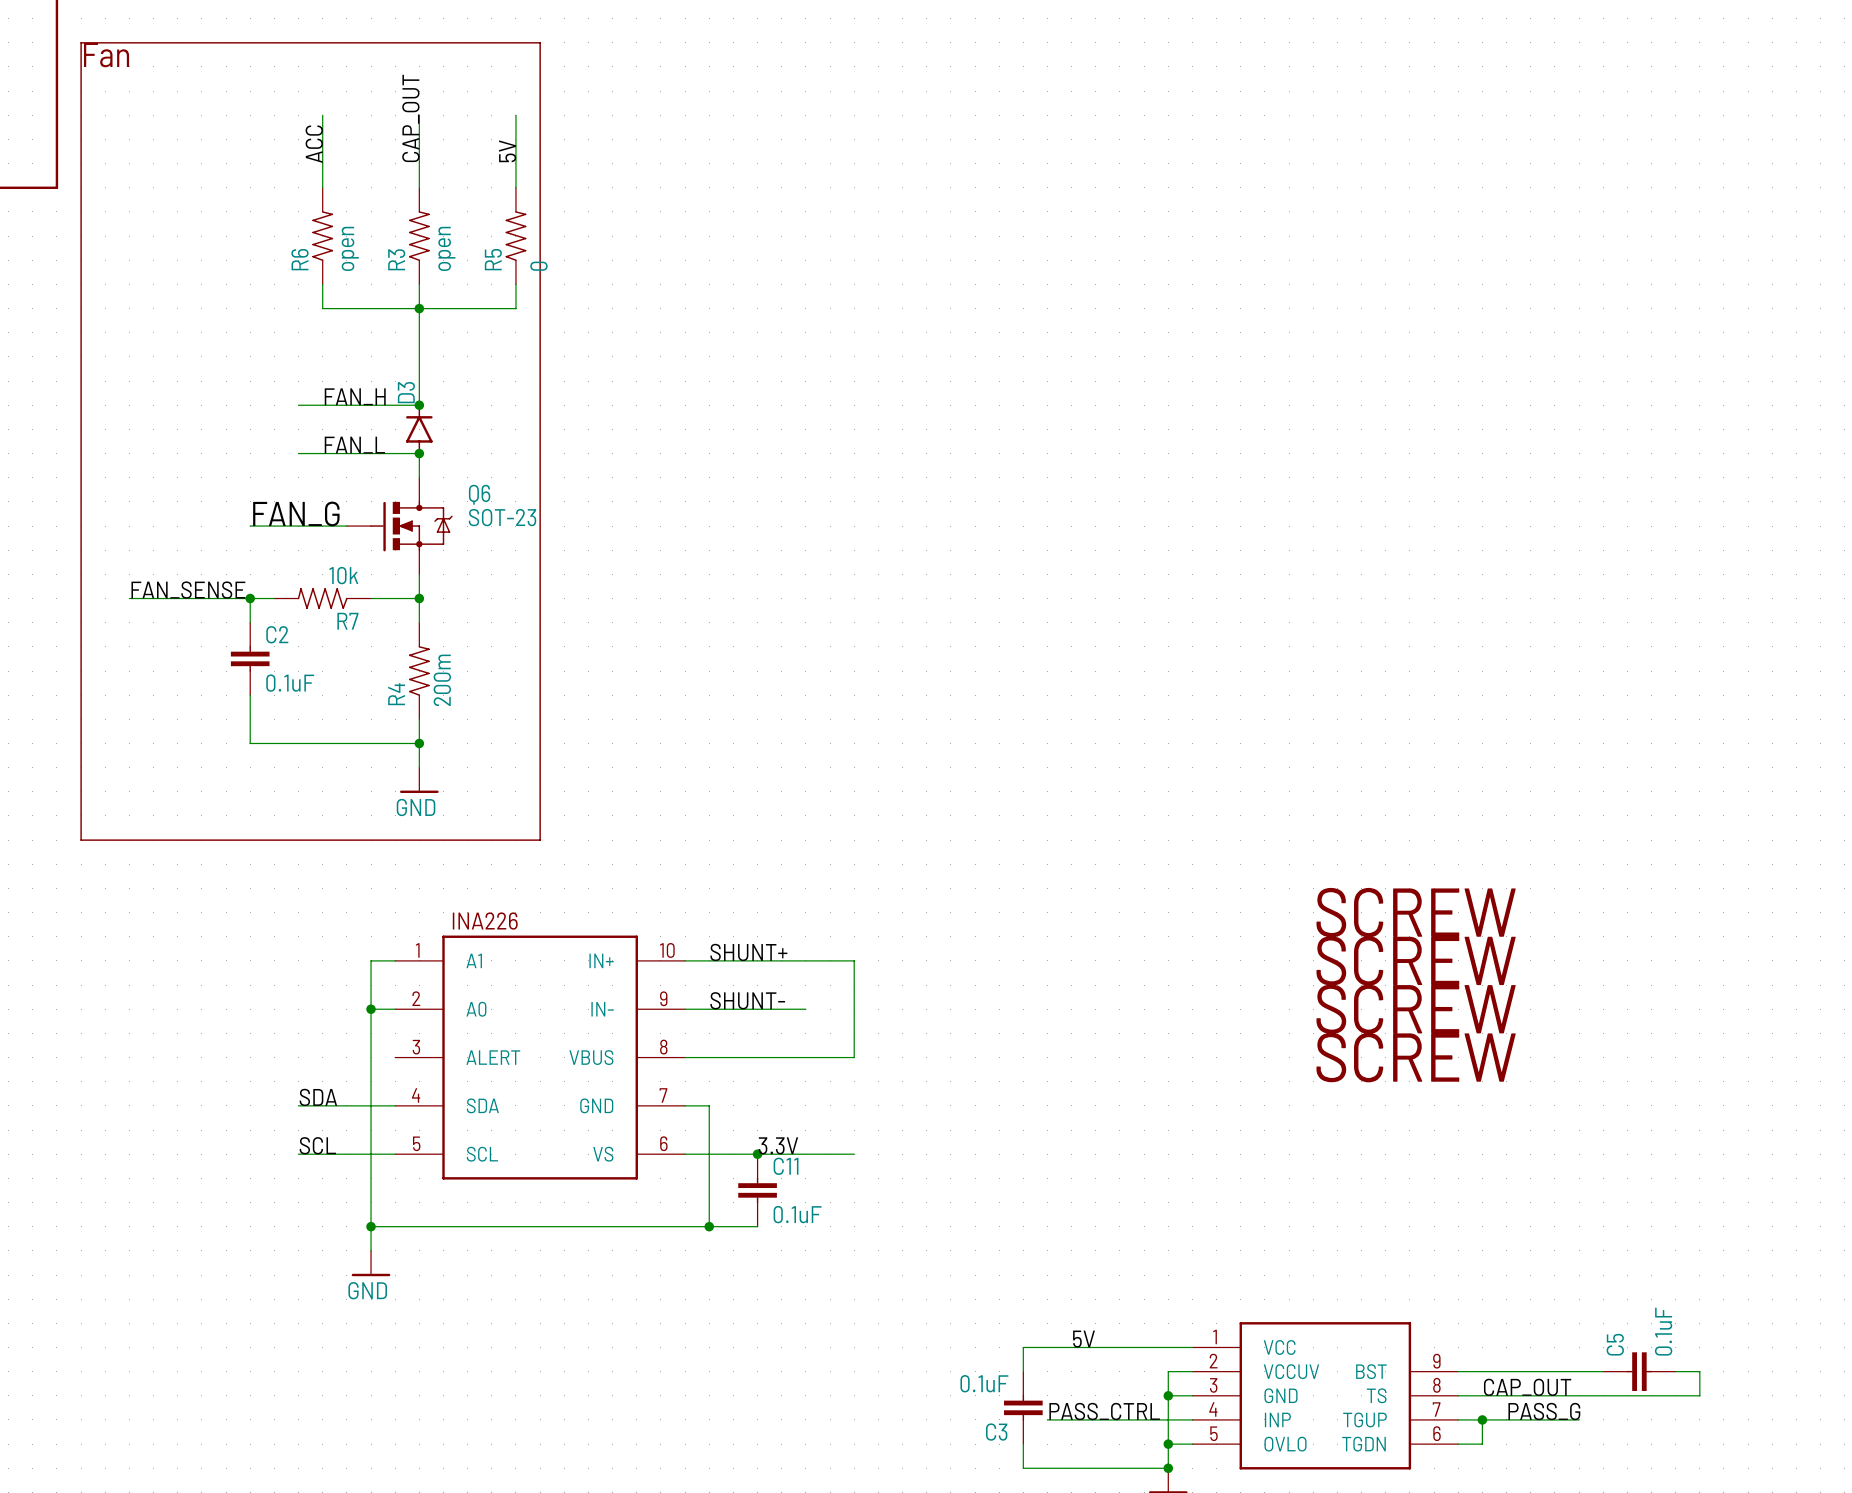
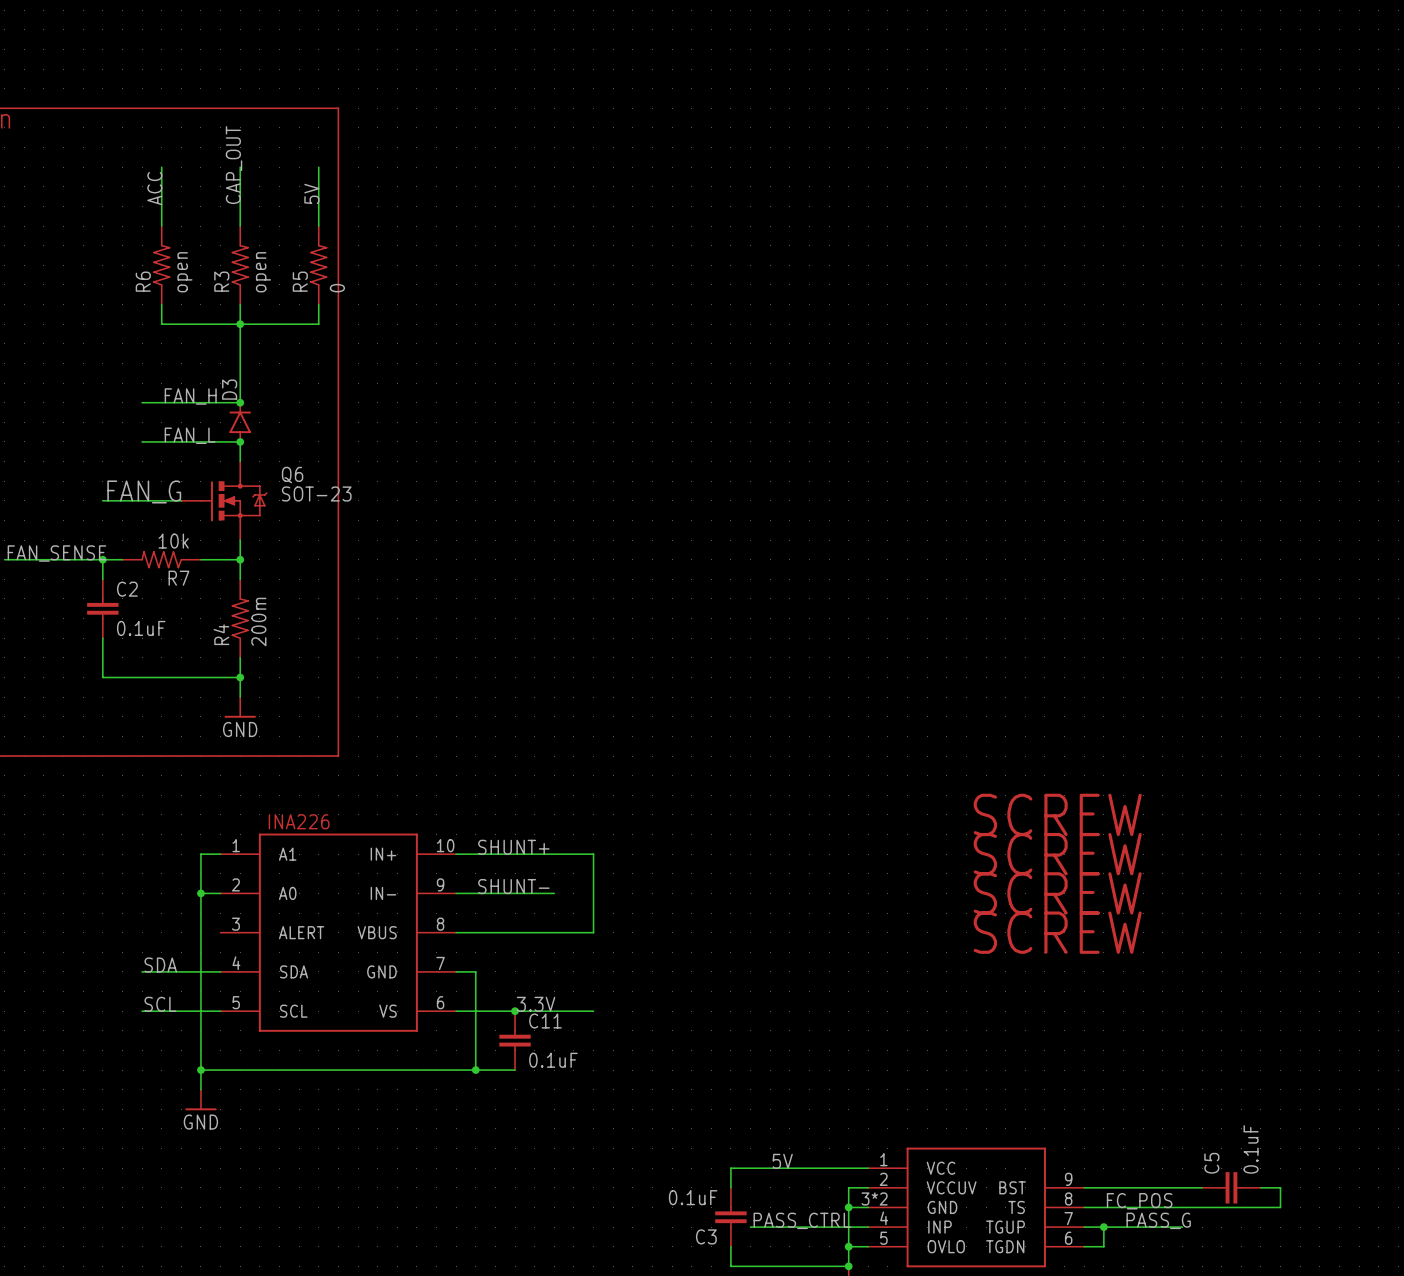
part pin number: 3 (1213, 1385) -> 3*2 (874, 1198)
label: CAP_OUT (1527, 1387) -> FC_POS (1139, 1201)

